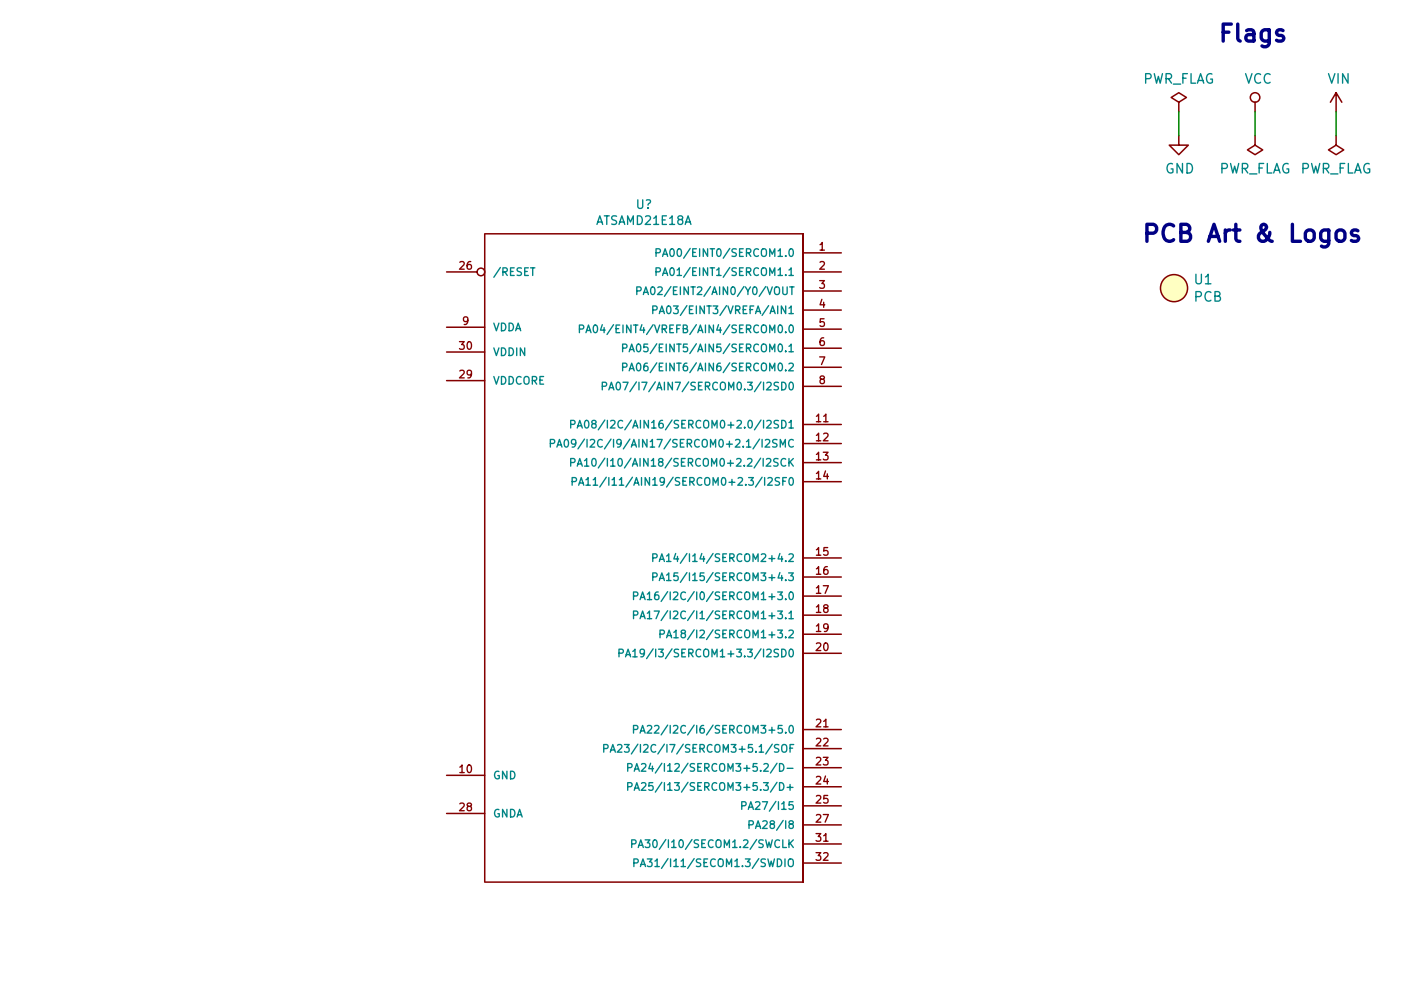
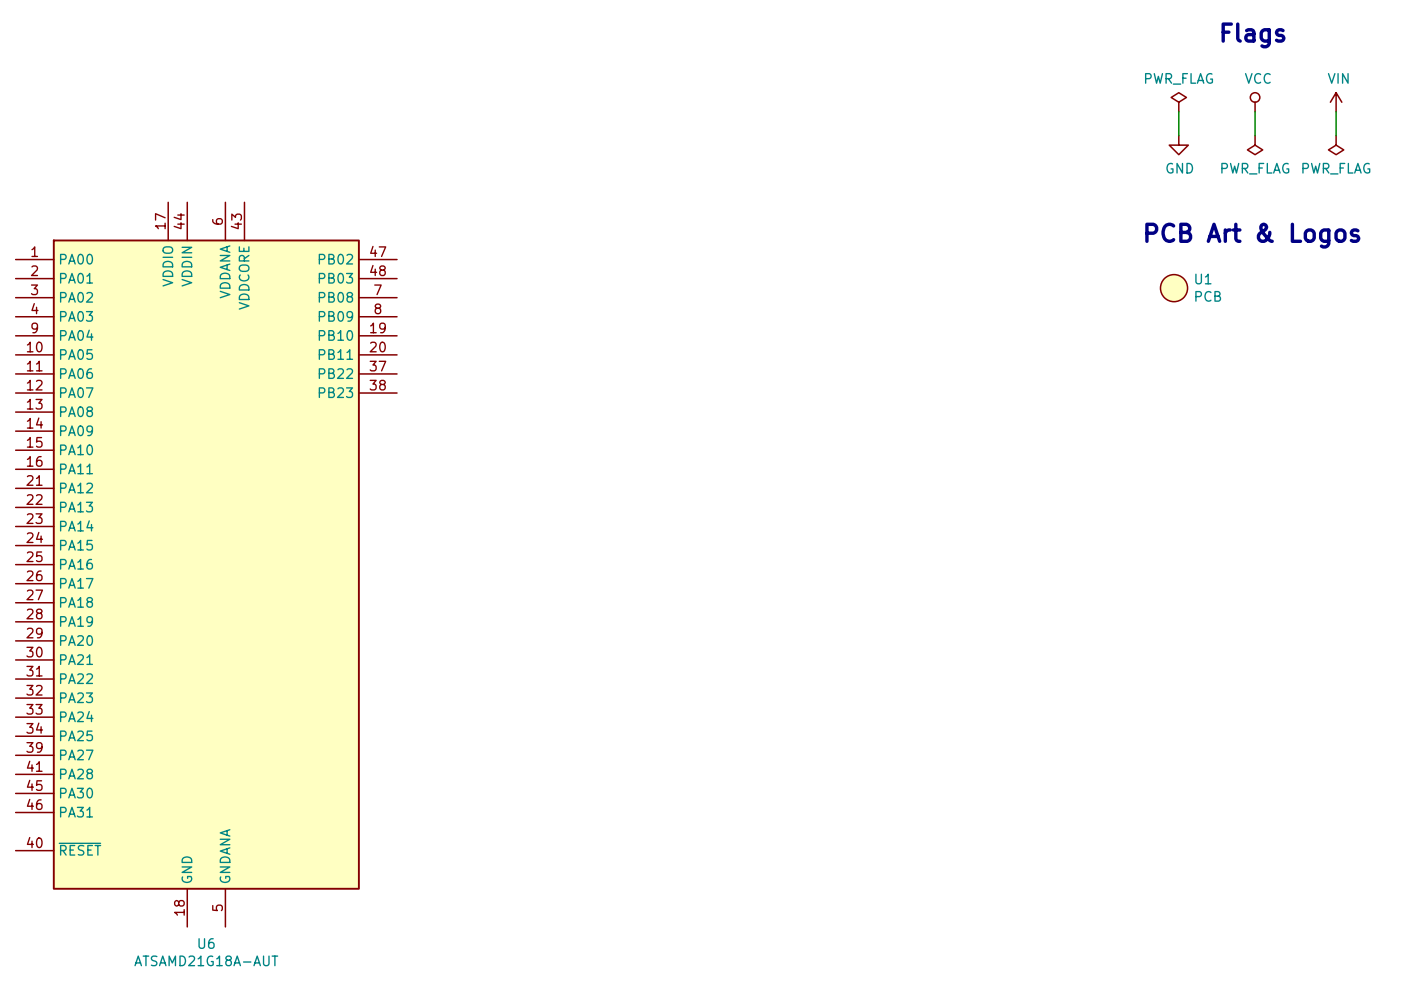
U?: ATSAMD21E18A (643, 557) -> none
U6: none -> ATSAMD21G18A-AUT (206, 564)

